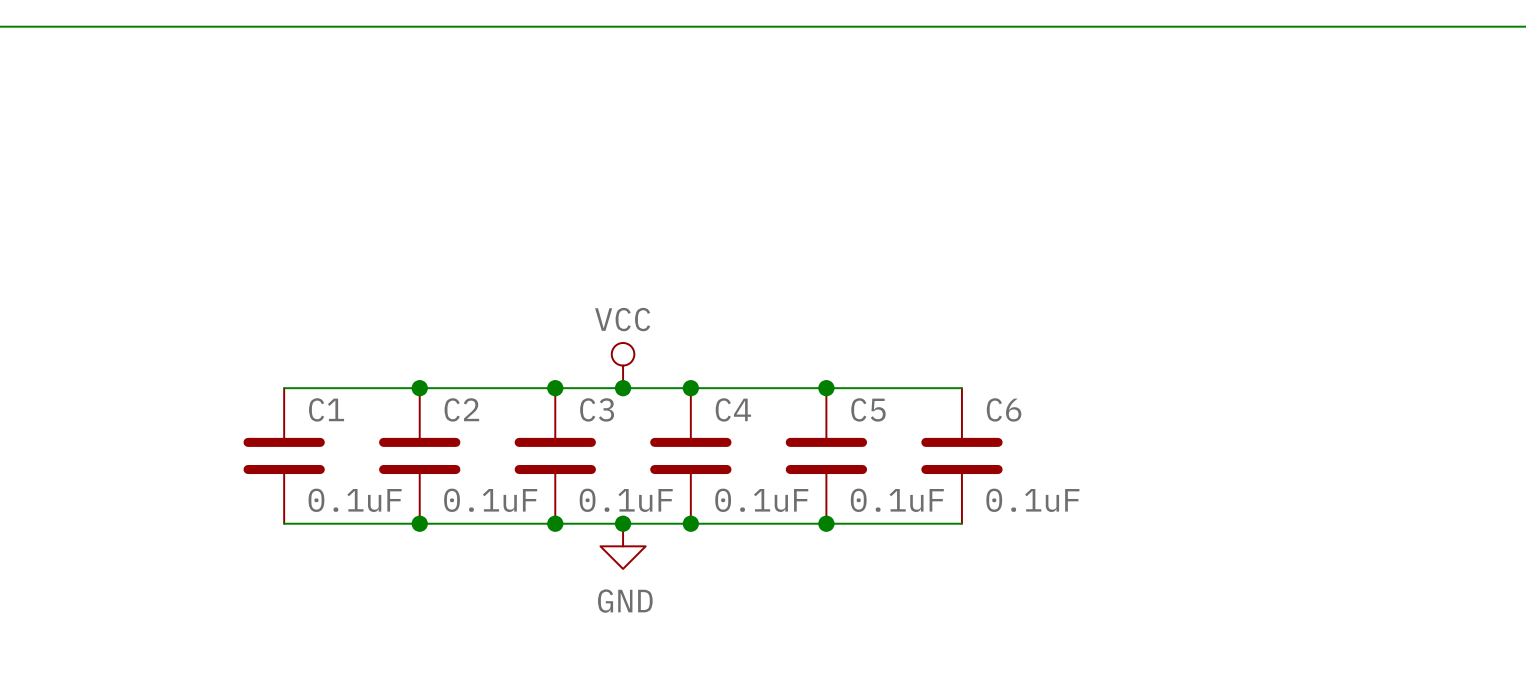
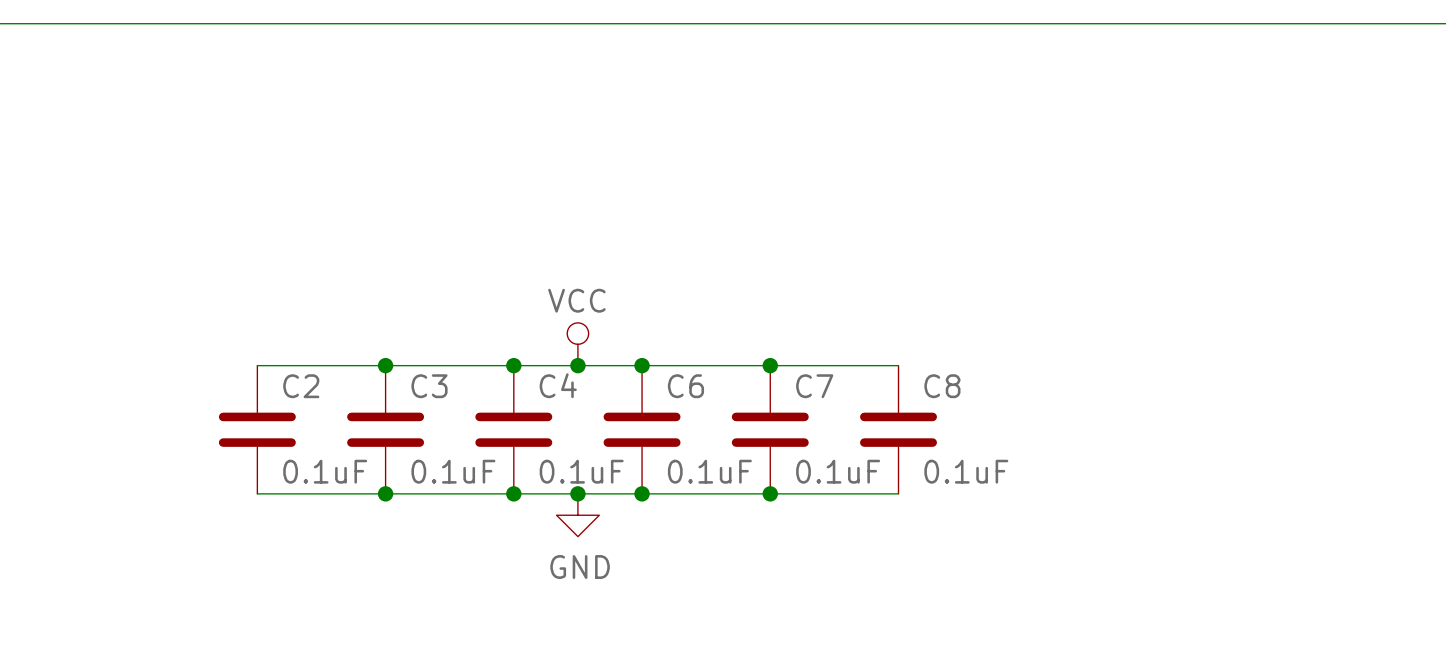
C1 name: C1 (326, 409) -> C2 (301, 386)
C2 name: C2 (461, 409) -> C3 (429, 386)
C3 name: C3 (597, 409) -> C4 (558, 385)
C4 name: C4 (733, 409) -> C6 (685, 386)
C5 name: C5 (868, 409) -> C7 (814, 386)
C6 name: C6 (1004, 409) -> C8 (942, 386)

